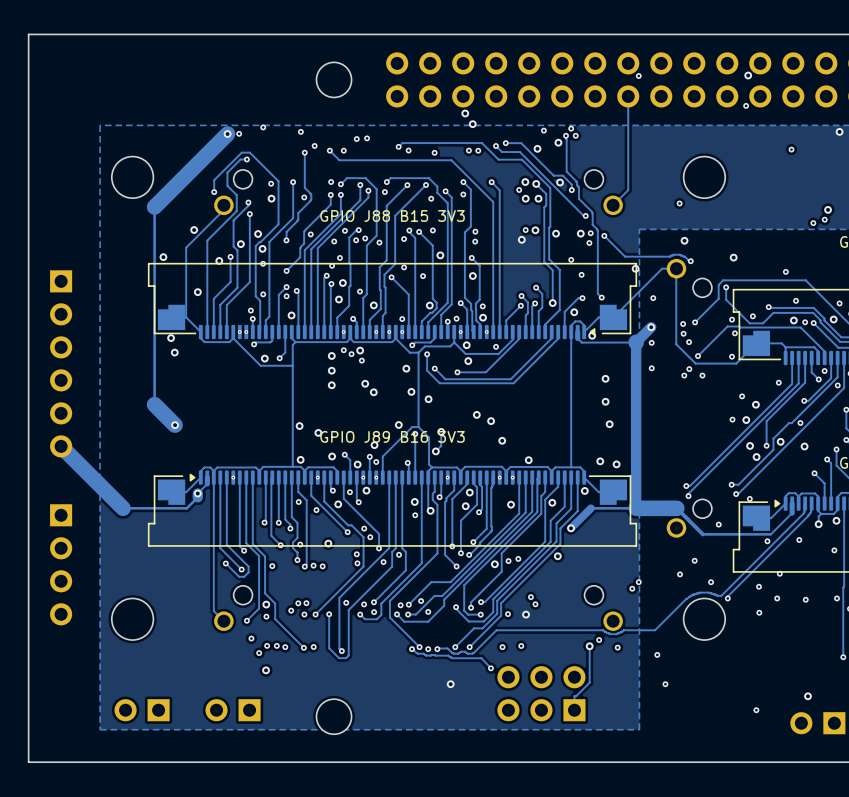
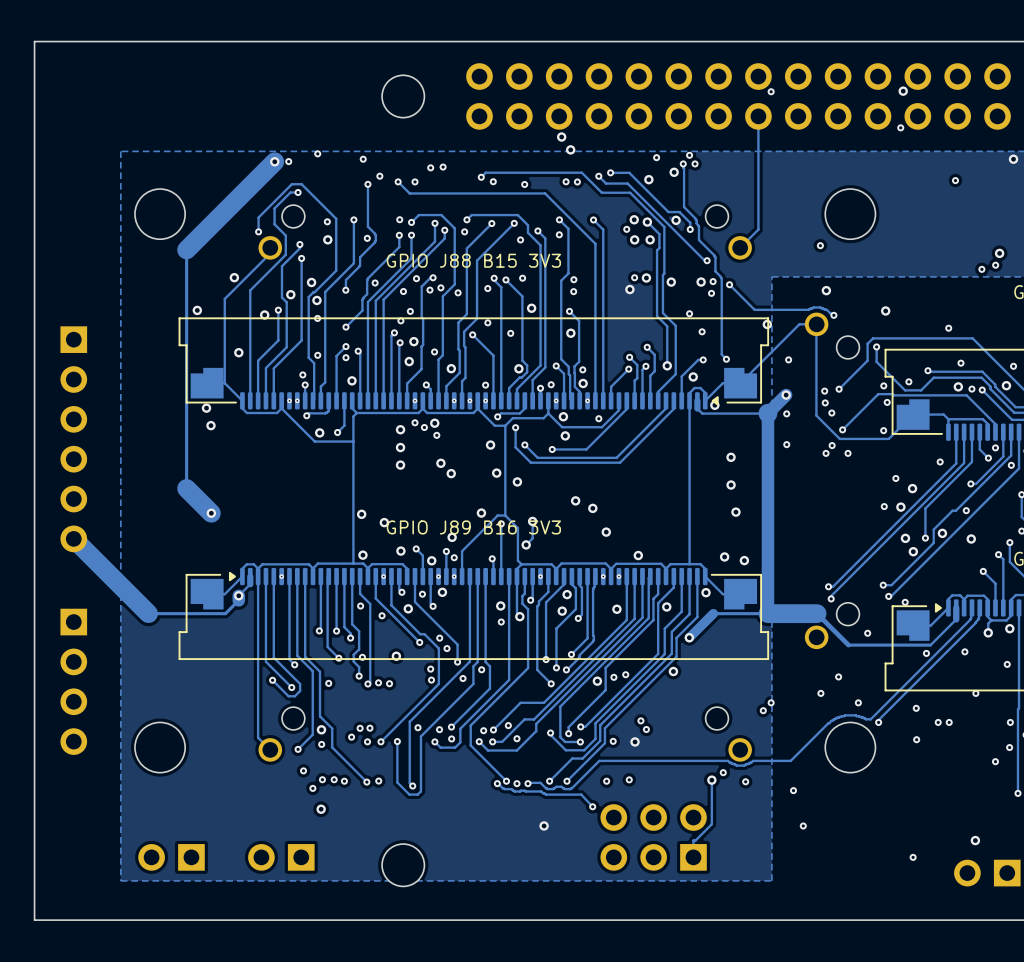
via: (779, 573) -> none
via: none -> (975, 693)
via: none -> (949, 722)
via: (805, 599) -> none
via: none -> (1009, 747)
via: none -> (995, 761)

